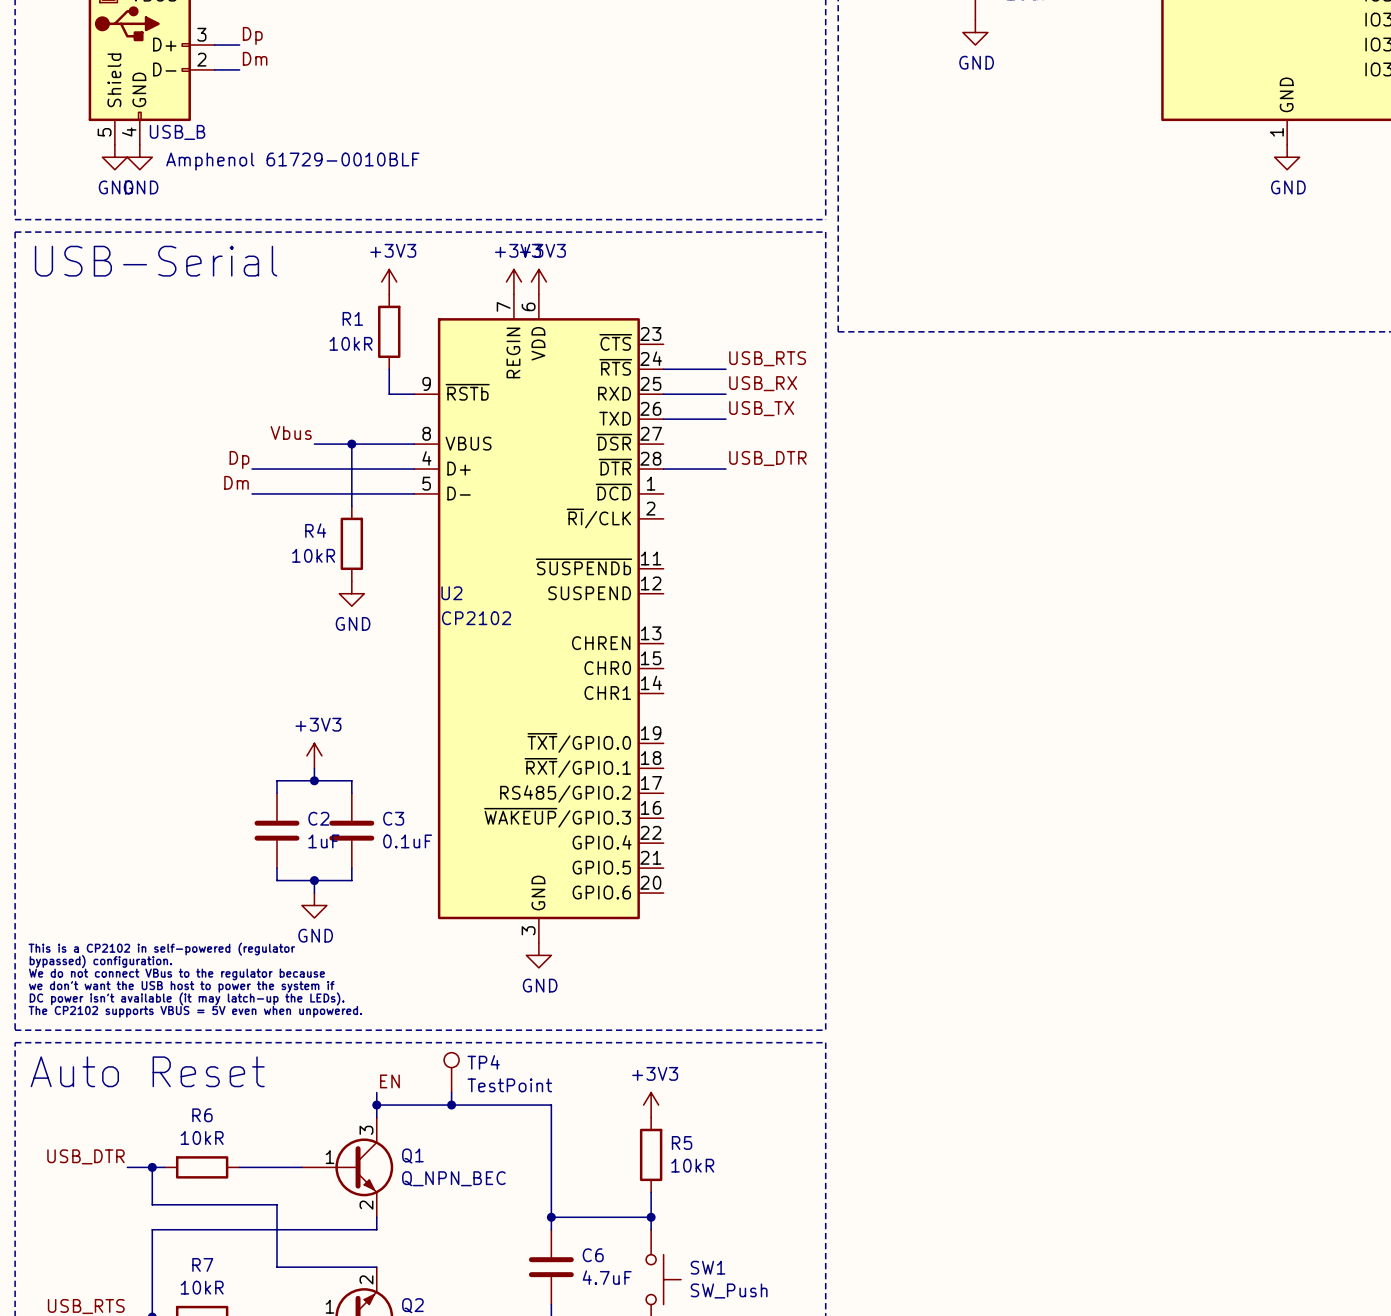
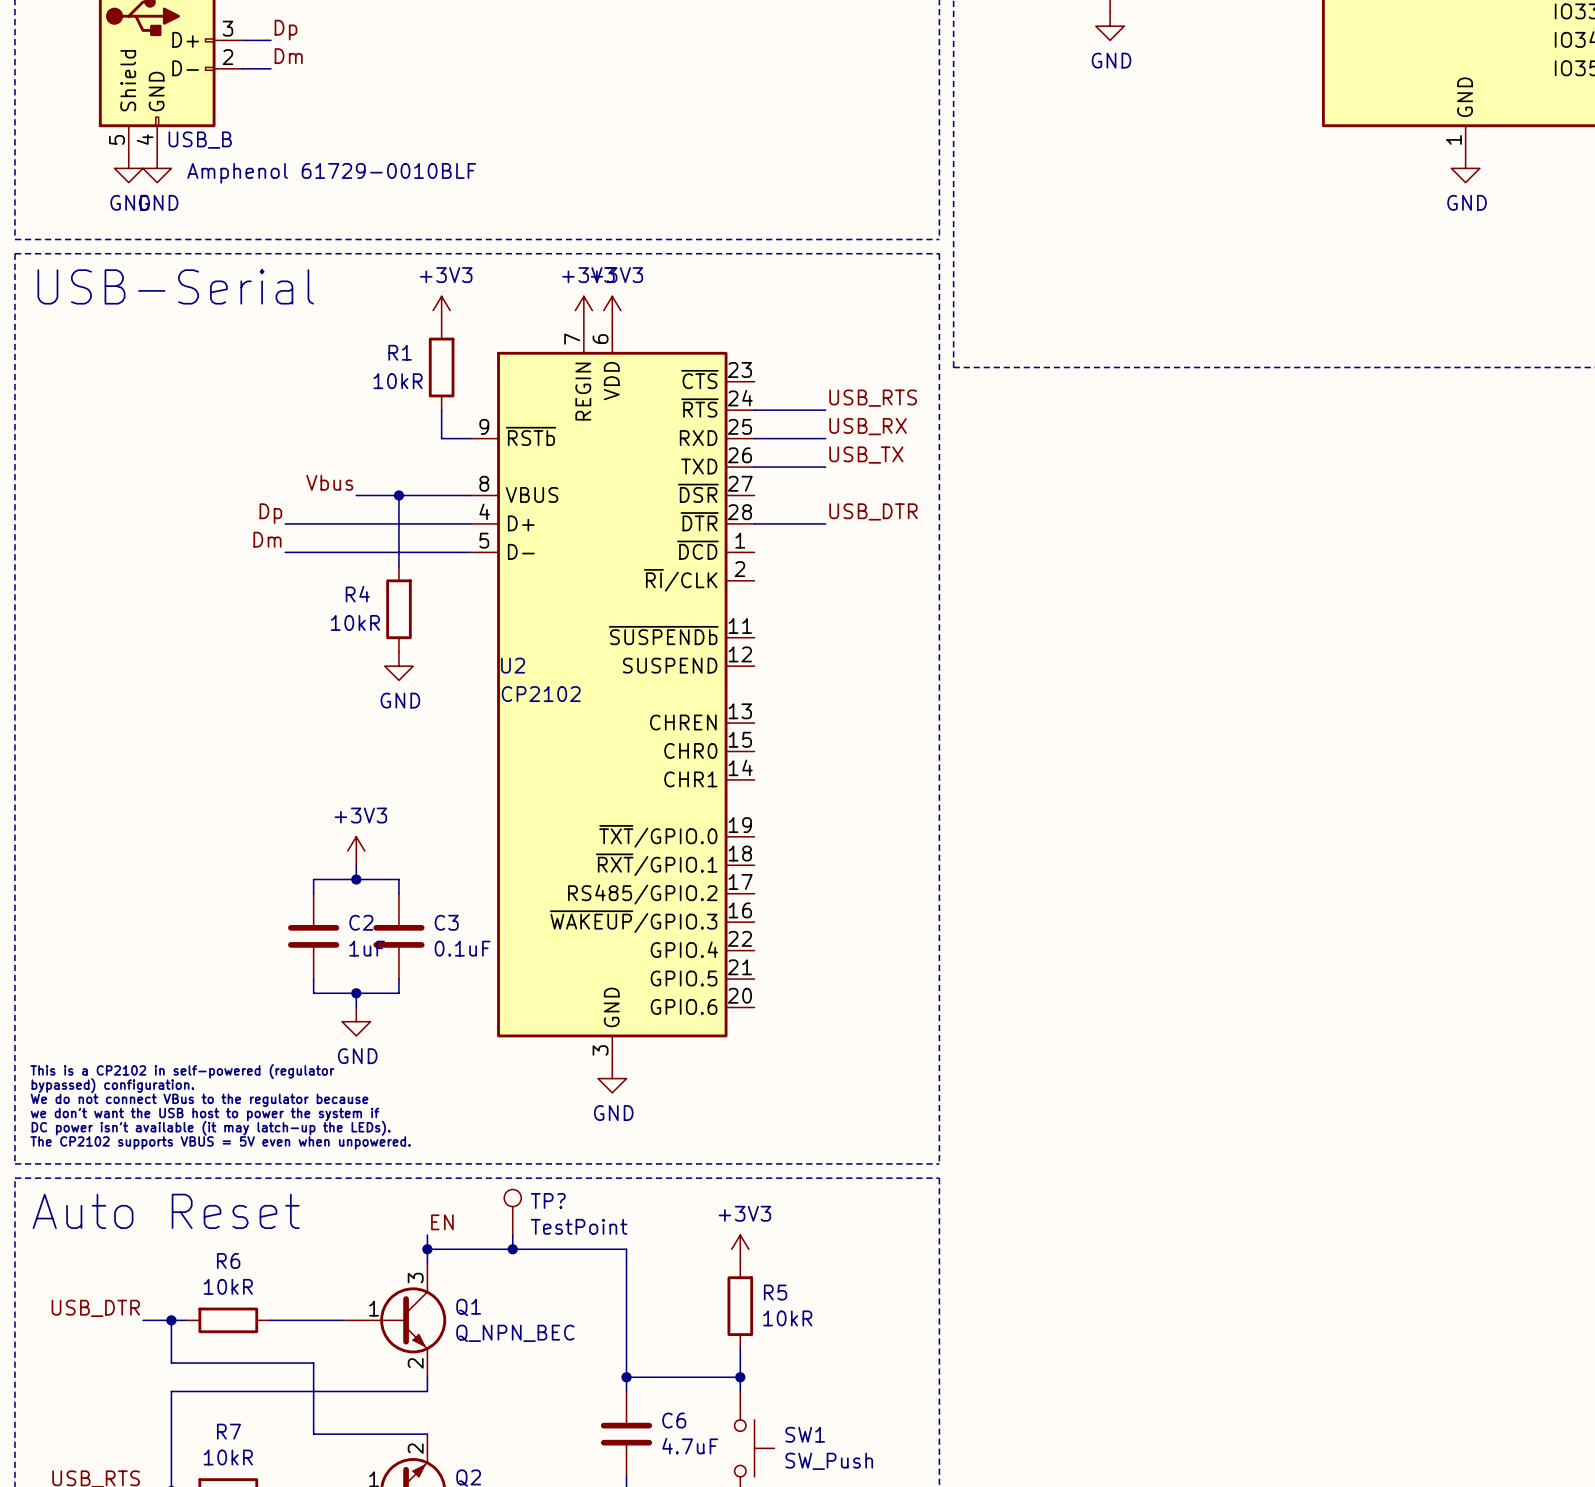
TP4 name: TP4 (483, 1062) -> TP? (548, 1200)

